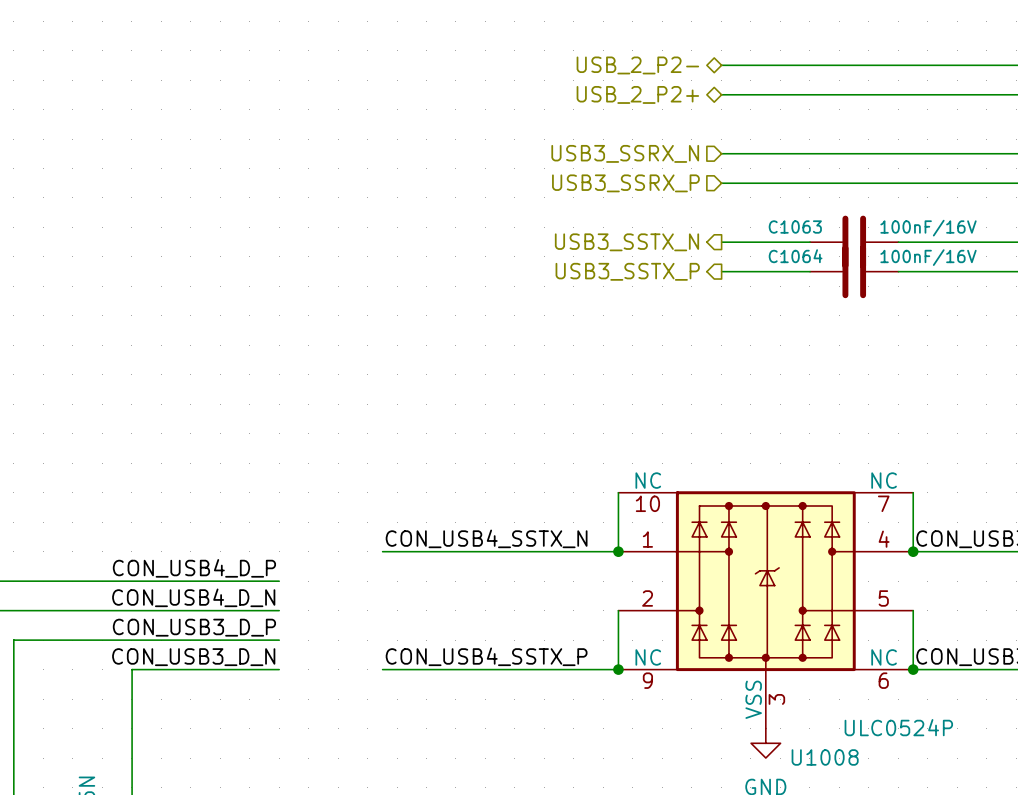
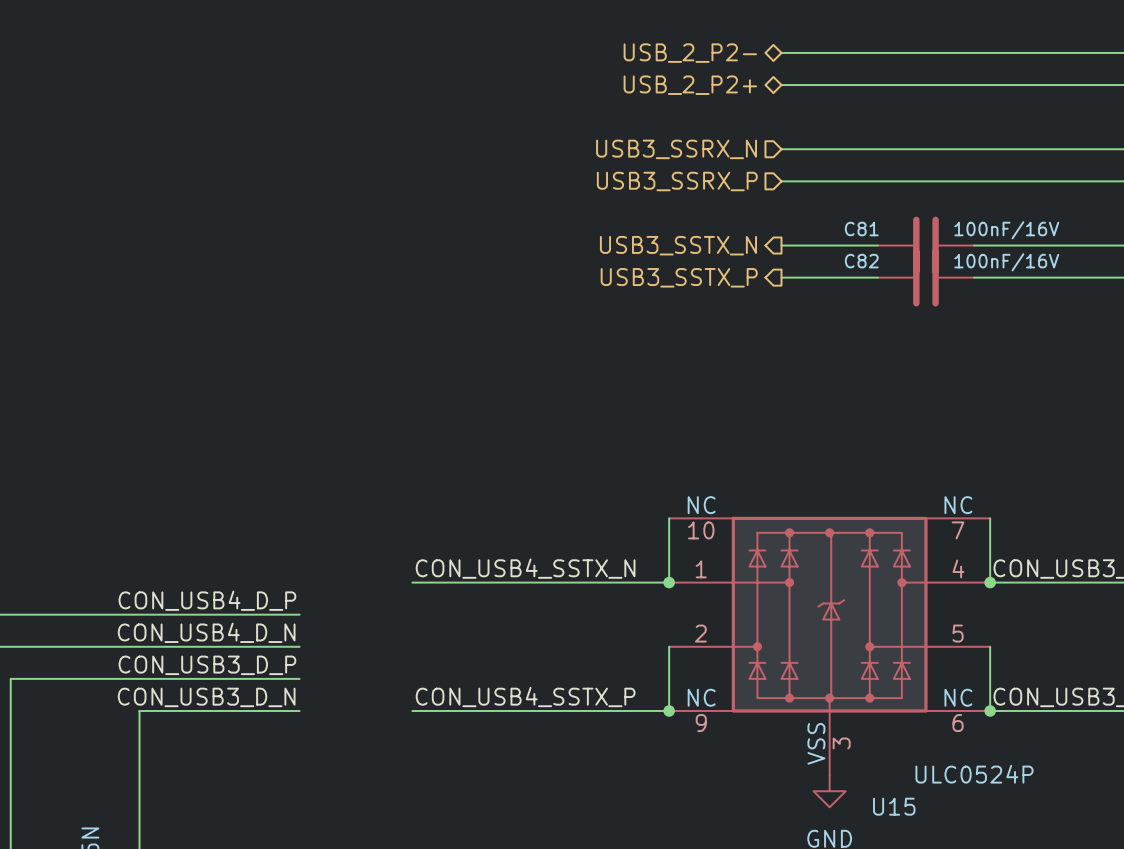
C1063 name: C1063 (795, 227) -> C81 (861, 229)
C1064 name: C1064 (795, 256) -> C82 (861, 261)
U1008 name: U1008 (825, 757) -> U15 (894, 806)

